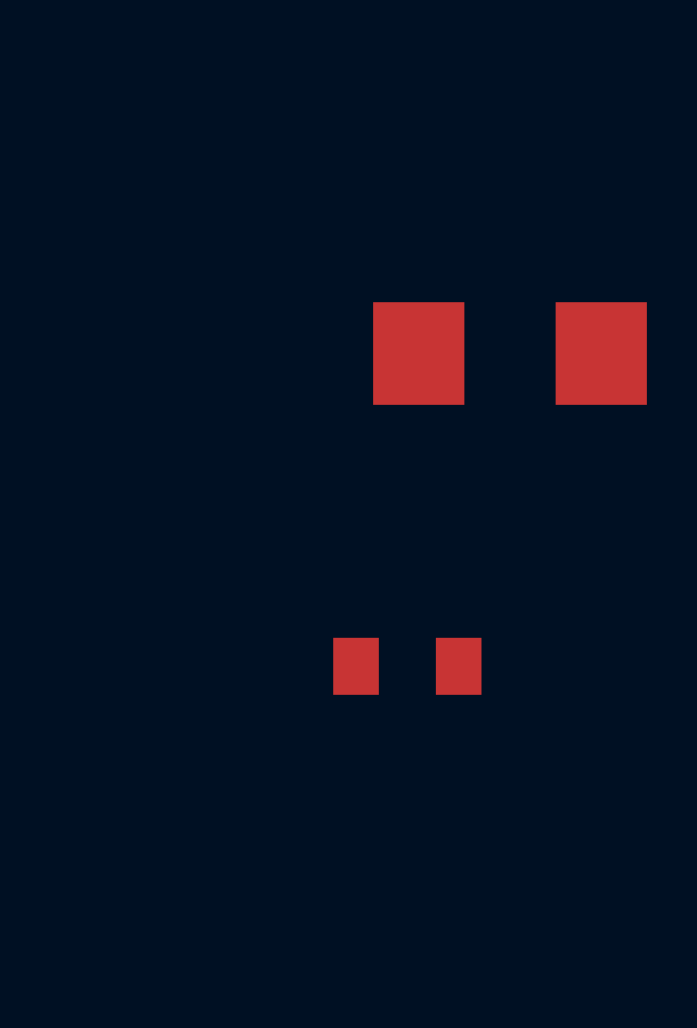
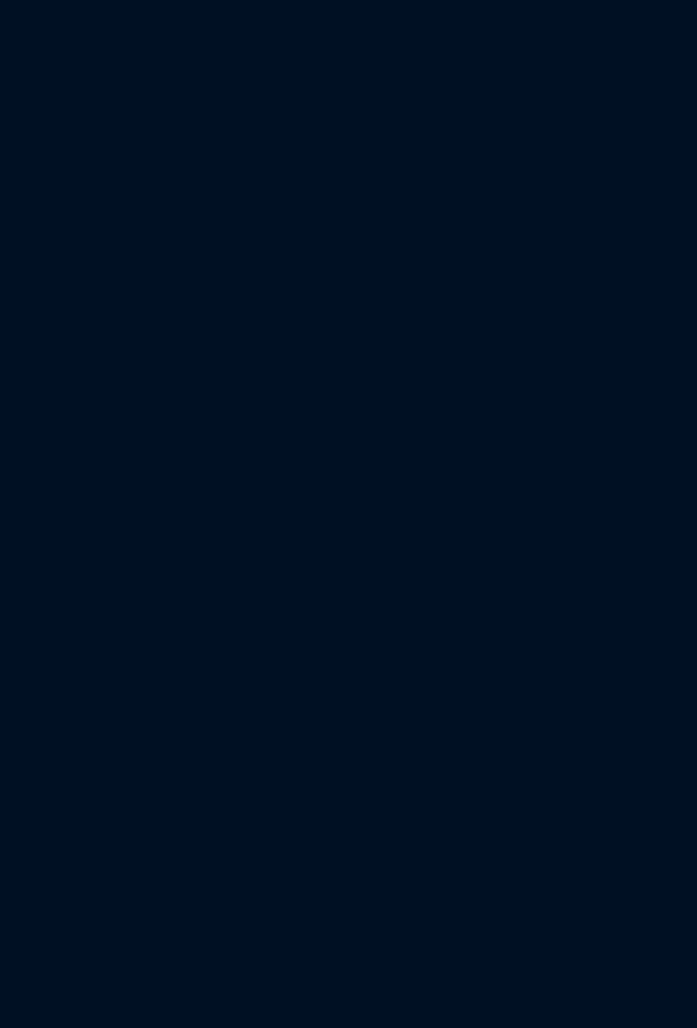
part: (509, 353) -> none
part: (407, 666) -> none

